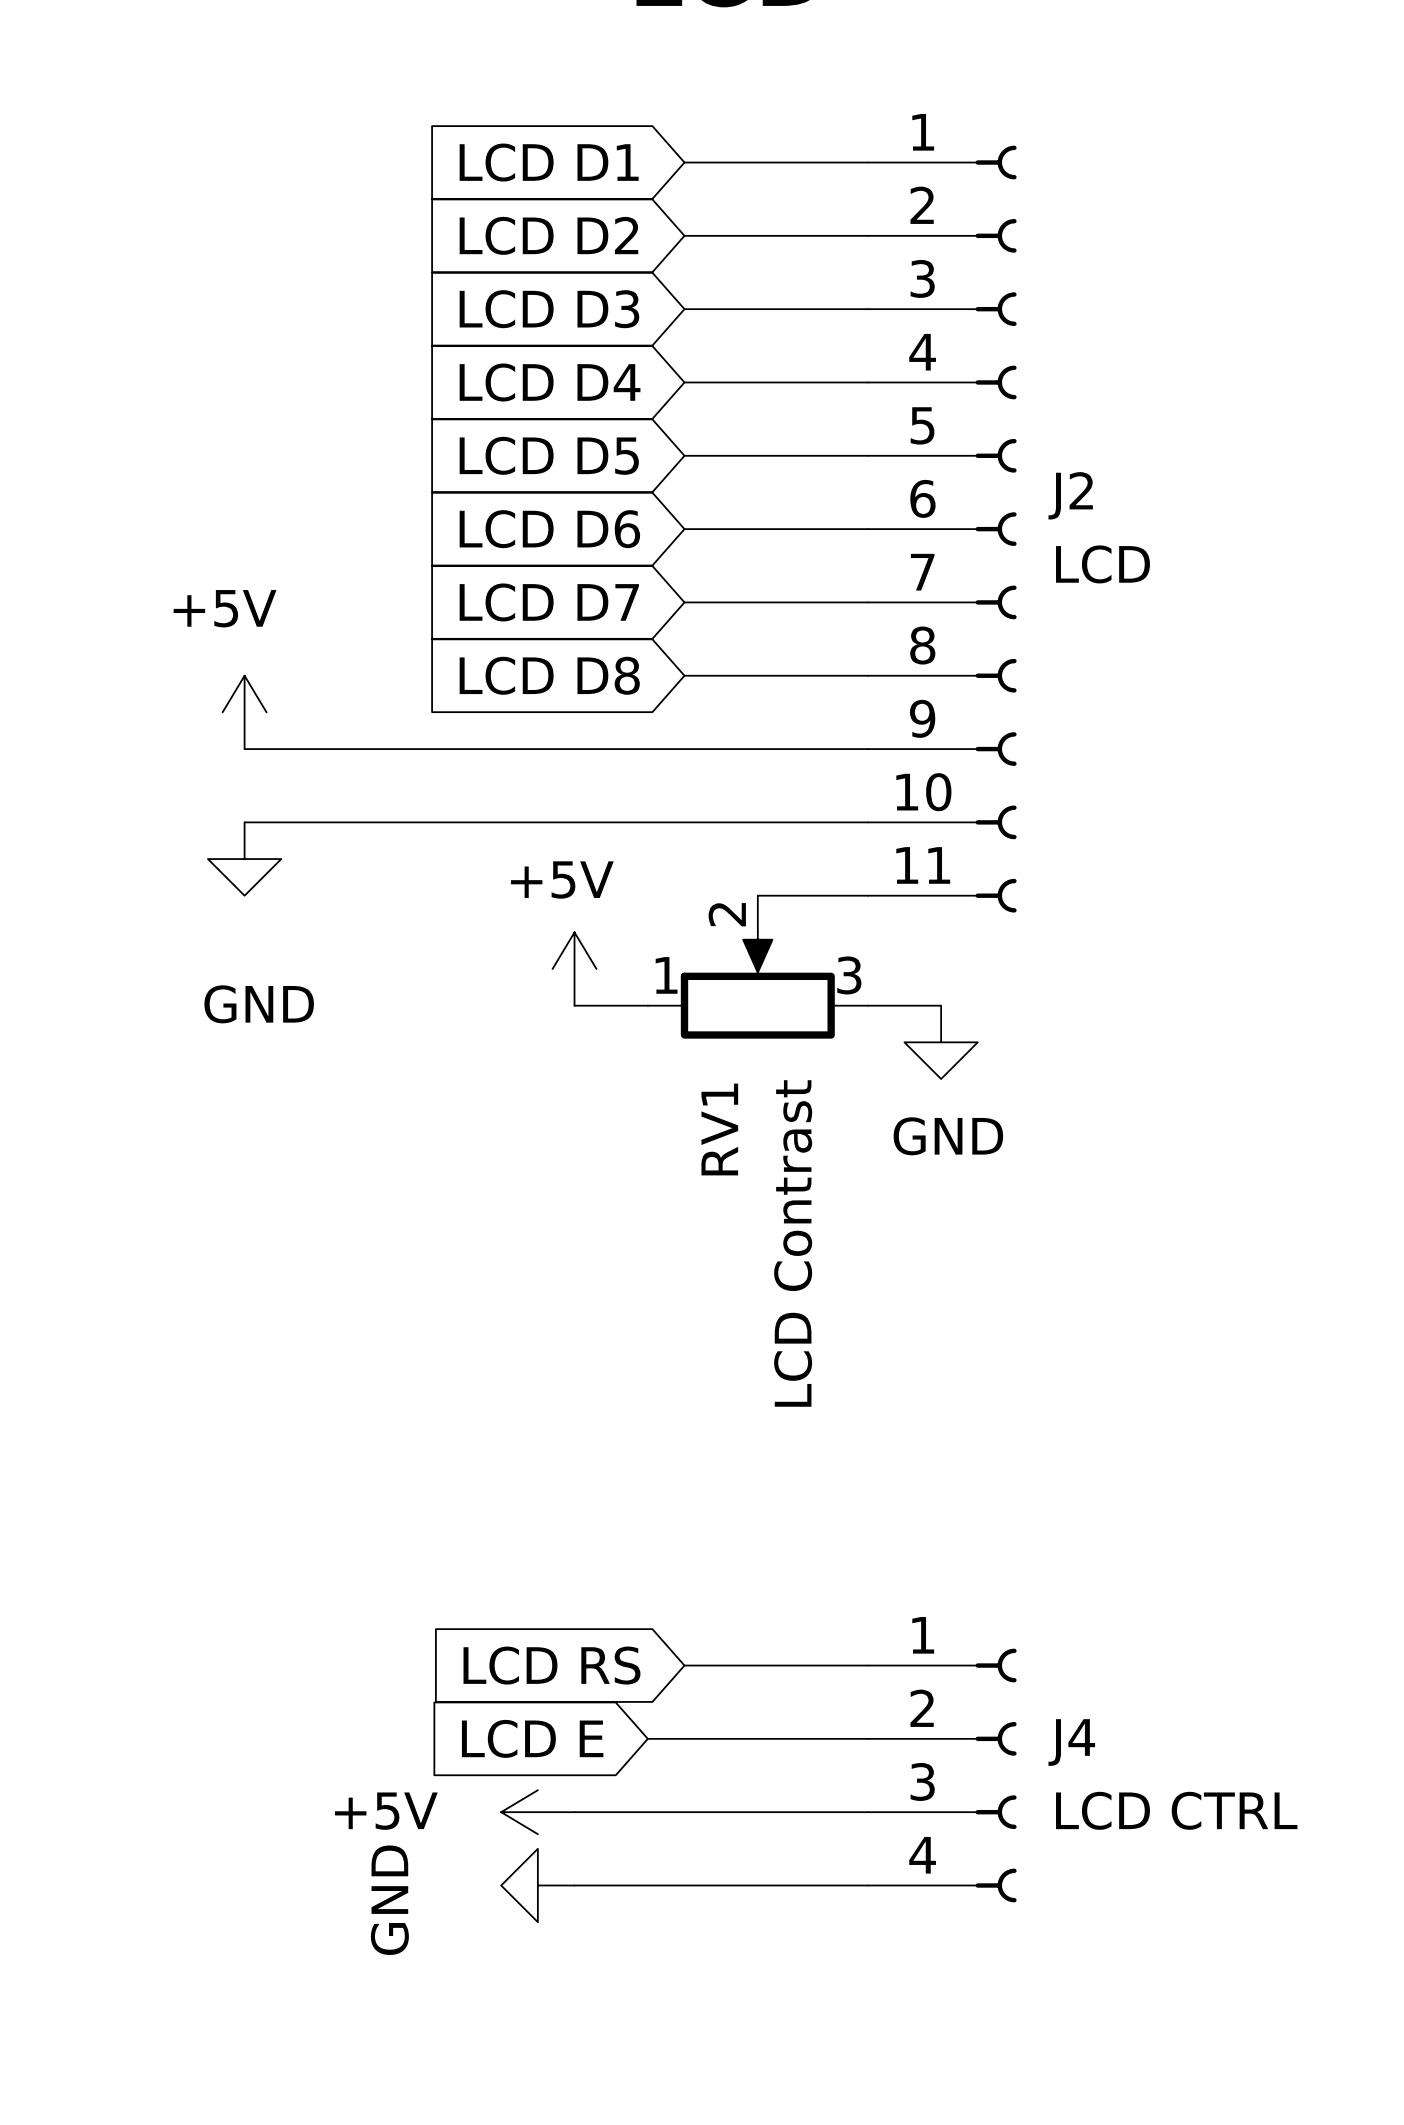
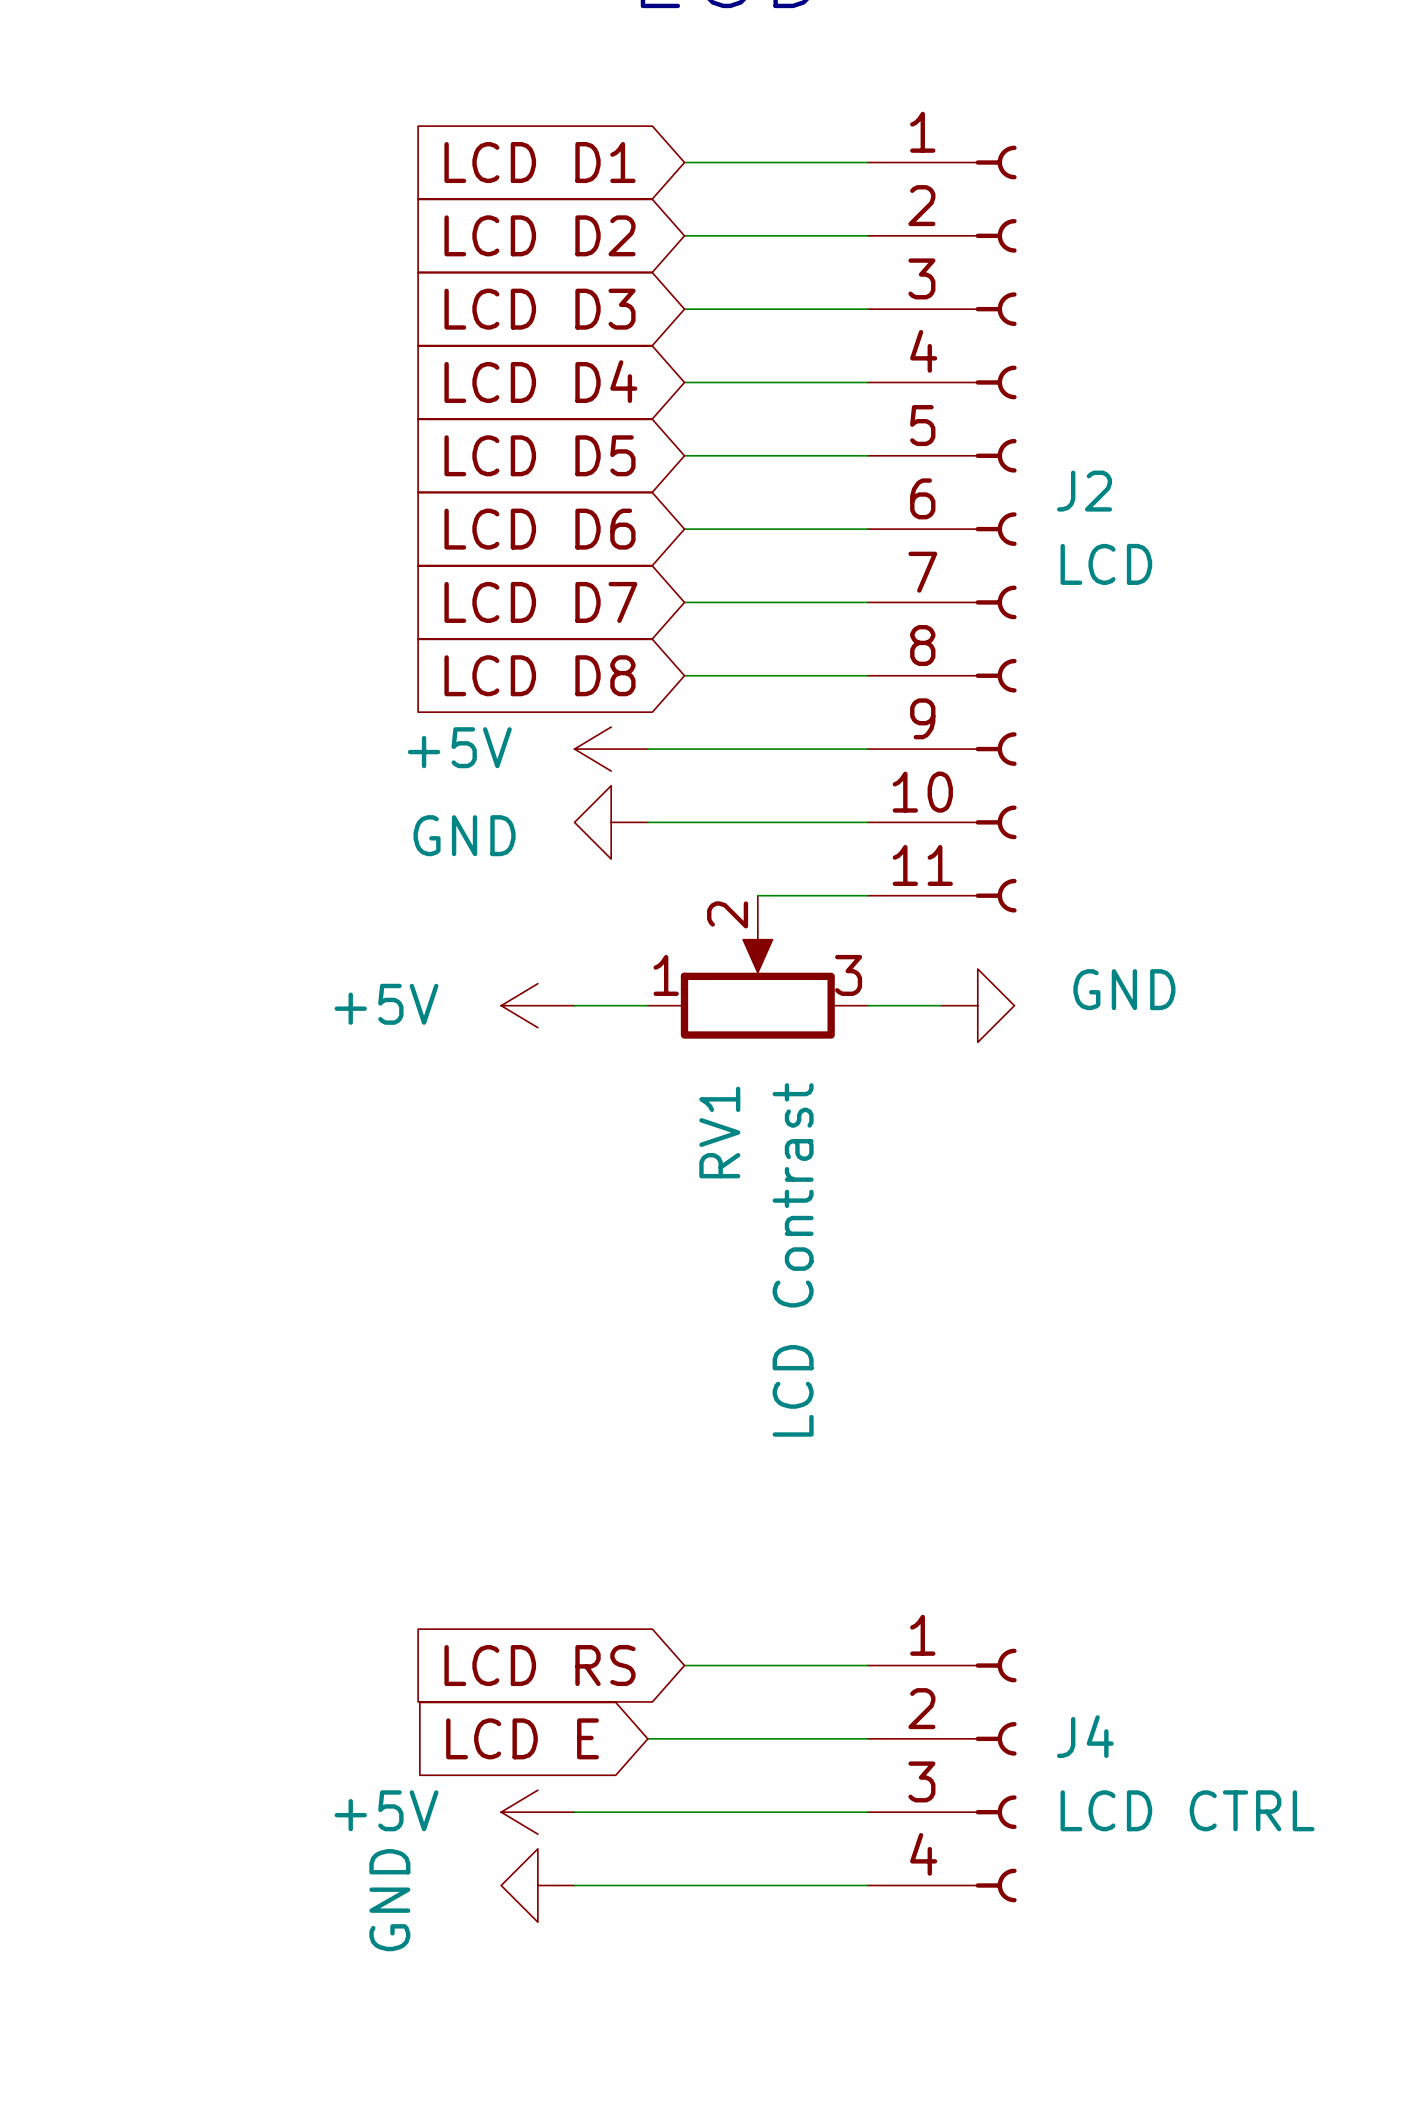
power symbol: +5V (244, 712) -> none
wire: (244, 749) (647, 749) -> none
power symbol: none -> +5V (611, 749)
wire: (244, 822) (647, 822) -> none
power symbol: none -> GND (611, 822)
power symbol: GND (244, 859) -> none
power symbol text position: +5V (562, 880) -> +5V (386, 1004)
power symbol rotation: 0° (574, 969) -> 90° counterclockwise (537, 1005)
power symbol position: +5V (574, 969) -> +5V (537, 1005)
power symbol rotation: 0° (941, 1042) -> 90° counterclockwise (977, 1005)
power symbol position: GND (941, 1042) -> GND (977, 1005)

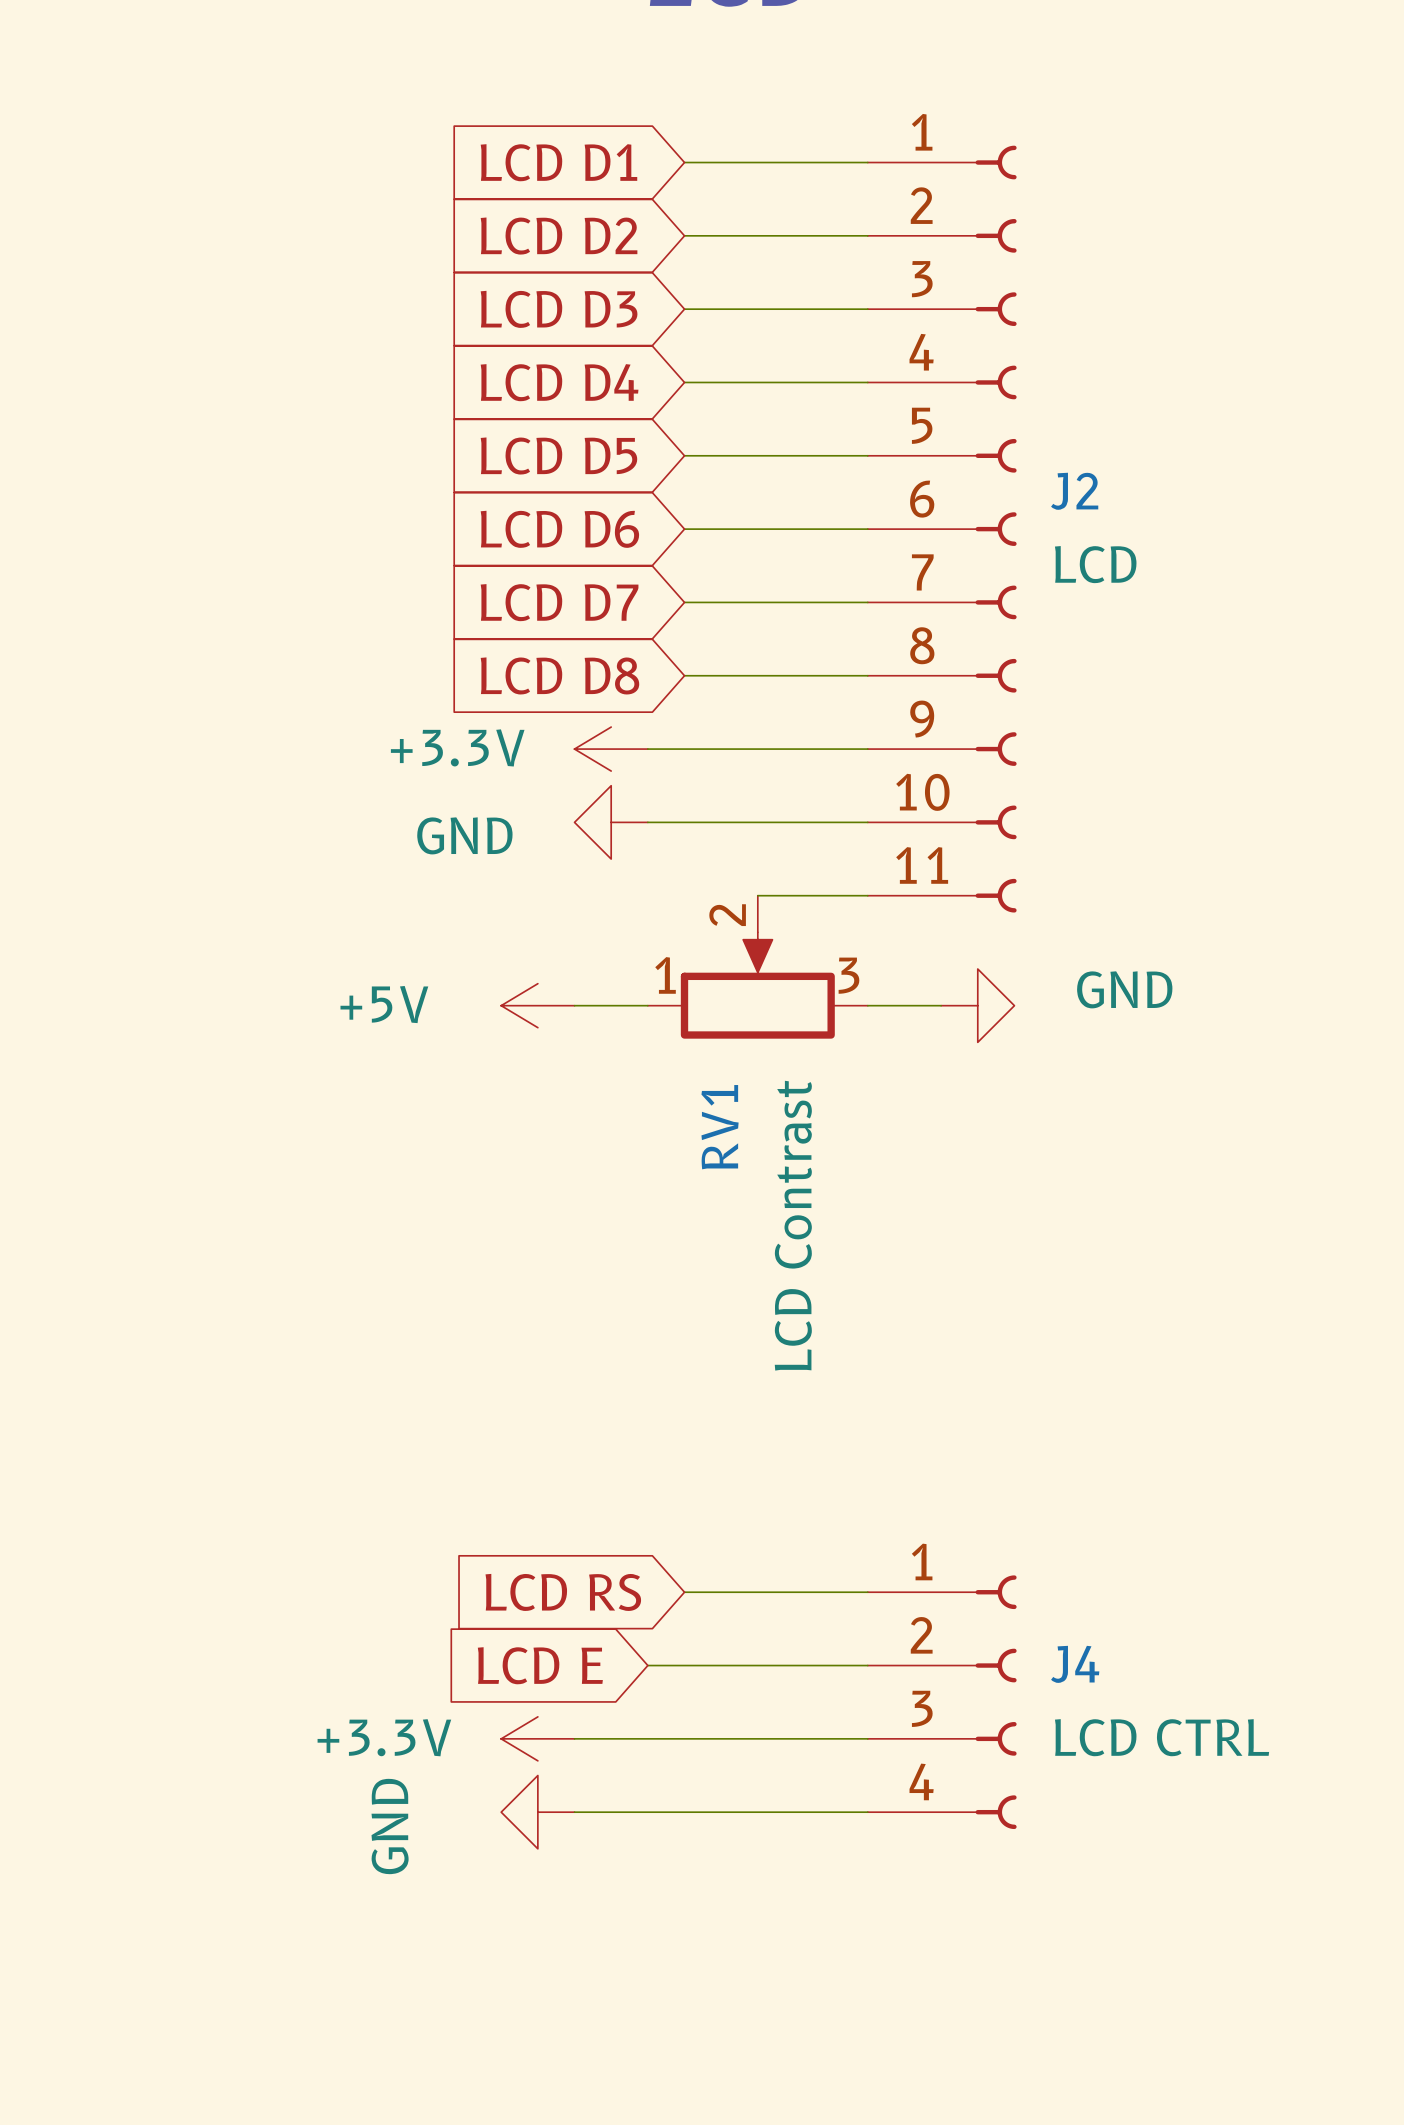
power symbol: +5V (611, 749) -> +3.3V (611, 749)
wire: none -> (684, 1592) (867, 1592)
global label position: LCD RS (539, 1665) -> LCD RS (563, 1592)
wire: none -> (647, 1665) (684, 1665)
global label position: LCD E (522, 1738) -> LCD E (540, 1665)
power symbol: none -> +3.3V (537, 1738)
wire: none -> (574, 1738) (647, 1738)
J4 position: (942, 1775) -> (942, 1702)
power symbol: +5V (537, 1812) -> GND (537, 1812)
power symbol: GND (537, 1885) -> none
wire: (574, 1885) (867, 1885) -> none

